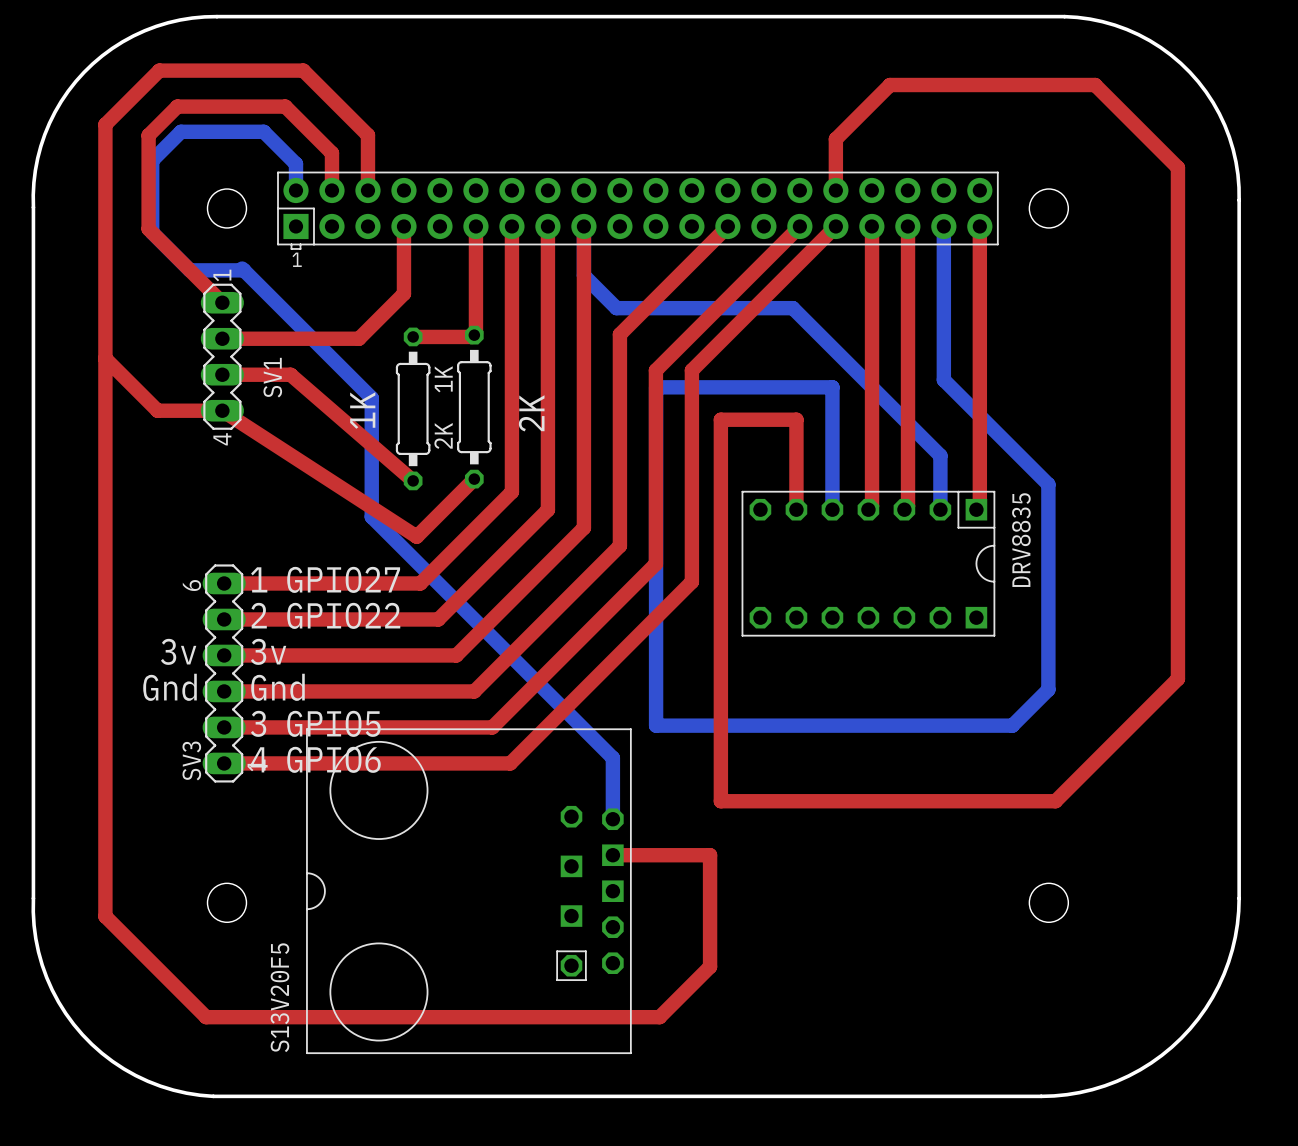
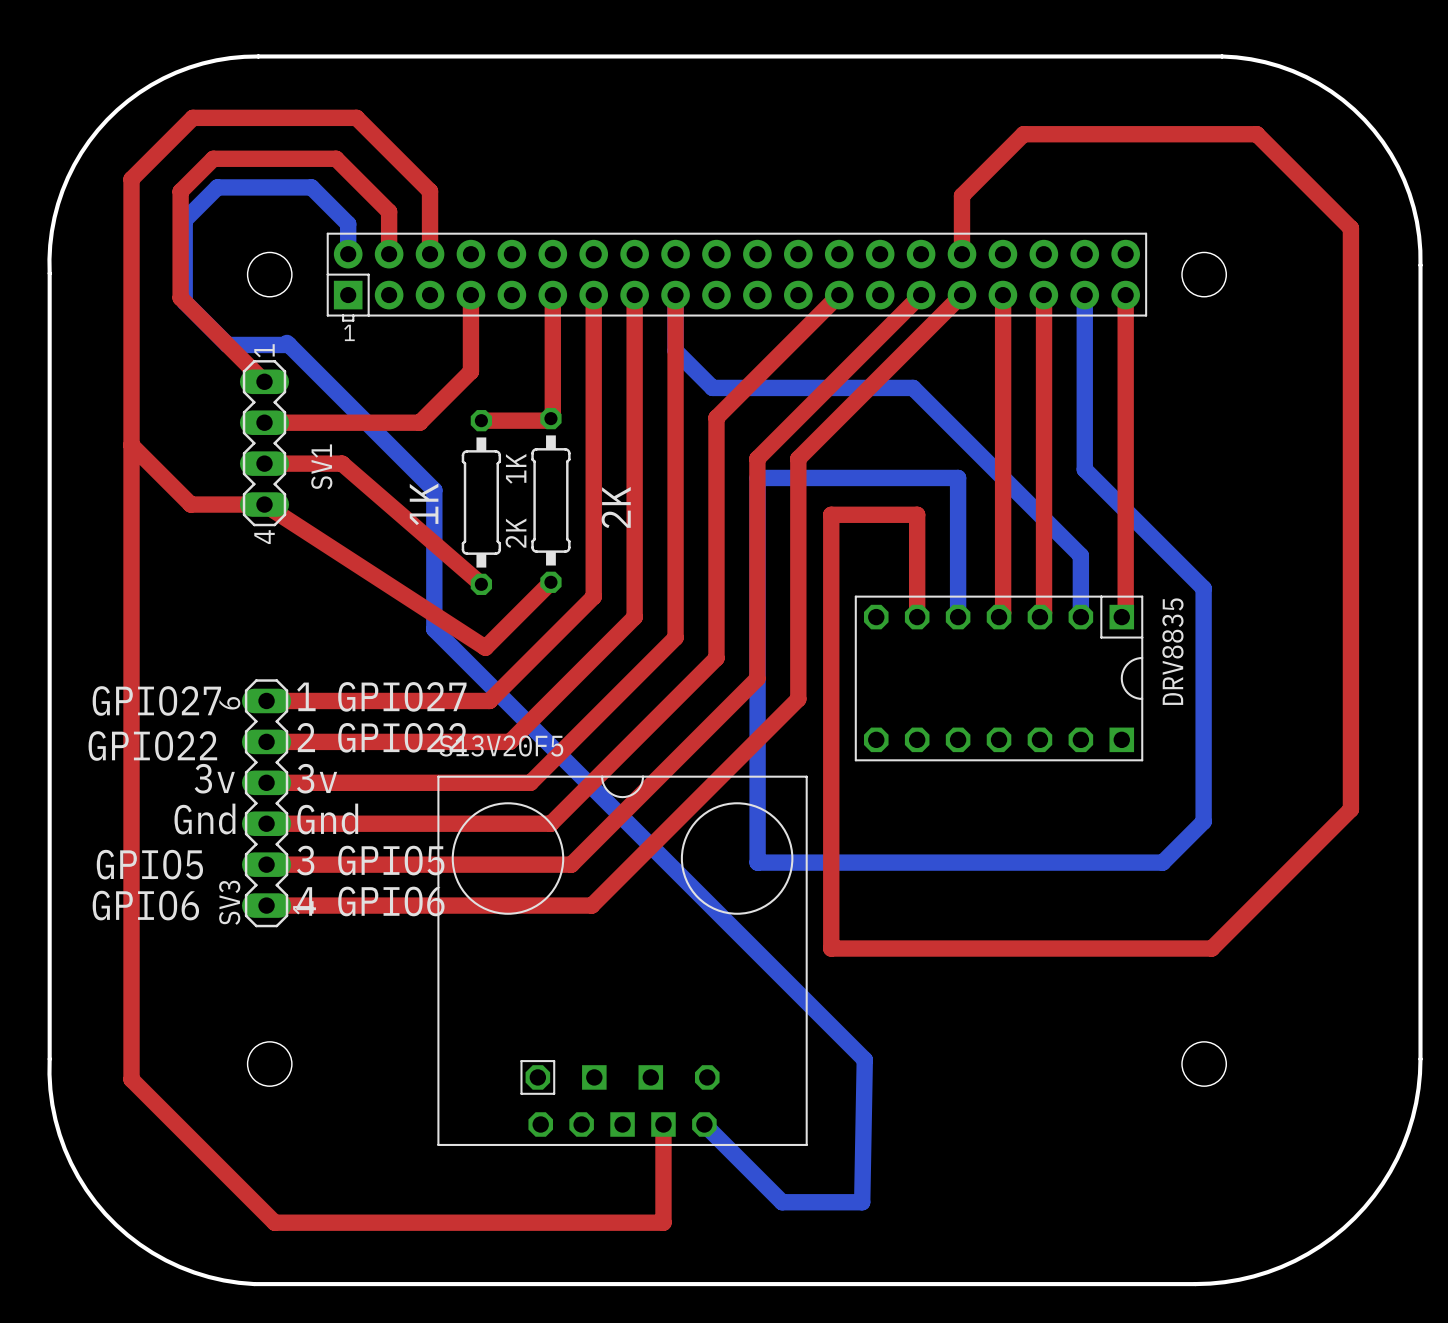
bottom track: (371, 516) (612, 758) (612, 819) -> (434, 625) (434, 629) (864, 1059) (862, 1202) (782, 1202) (704, 1124)
text: none -> GPIO27 (156, 700)
text: none -> GPIO22 (152, 745)
text: none -> GPIO5 (149, 864)
text: none -> GPIO6 (145, 905)
top track: (612, 855) (710, 855) (710, 966) (659, 1017) (206, 1017) -> (663, 1124) (663, 1222) (274, 1222) (246, 1194)
part rotation: 0° (468, 891) -> 90° clockwise (622, 960)

